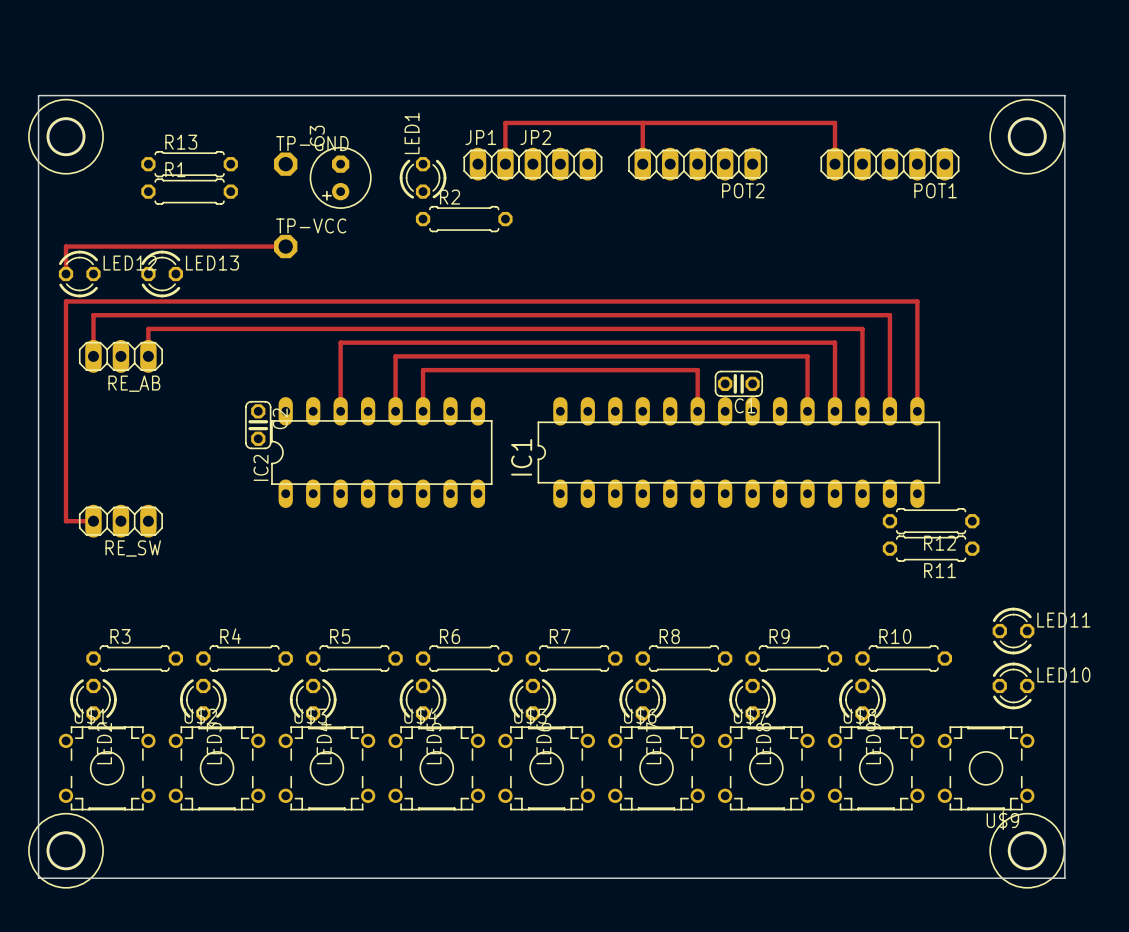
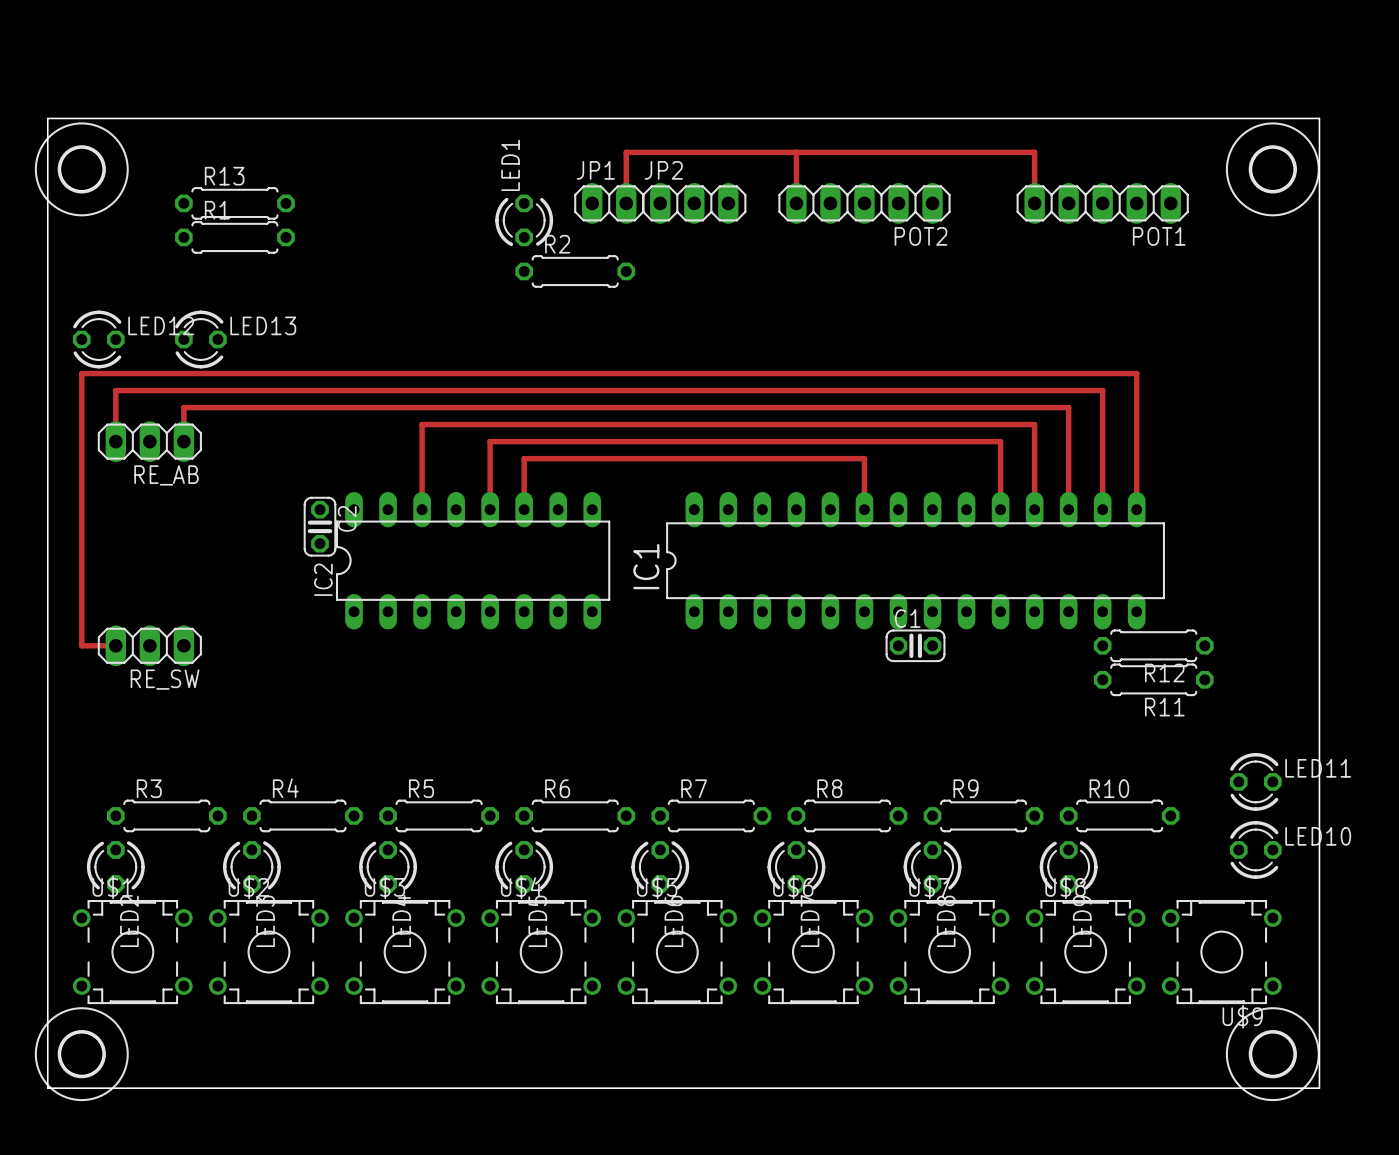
TP-GND: (285, 164) -> none
C3: (340, 177) -> none
track: (285, 246) (66, 246) (66, 274) -> none
TP-VCC: (285, 246) -> none
C1 rotation: 0° (738, 383) -> 180° (915, 645)
C1 position: (738, 383) -> (915, 645)

